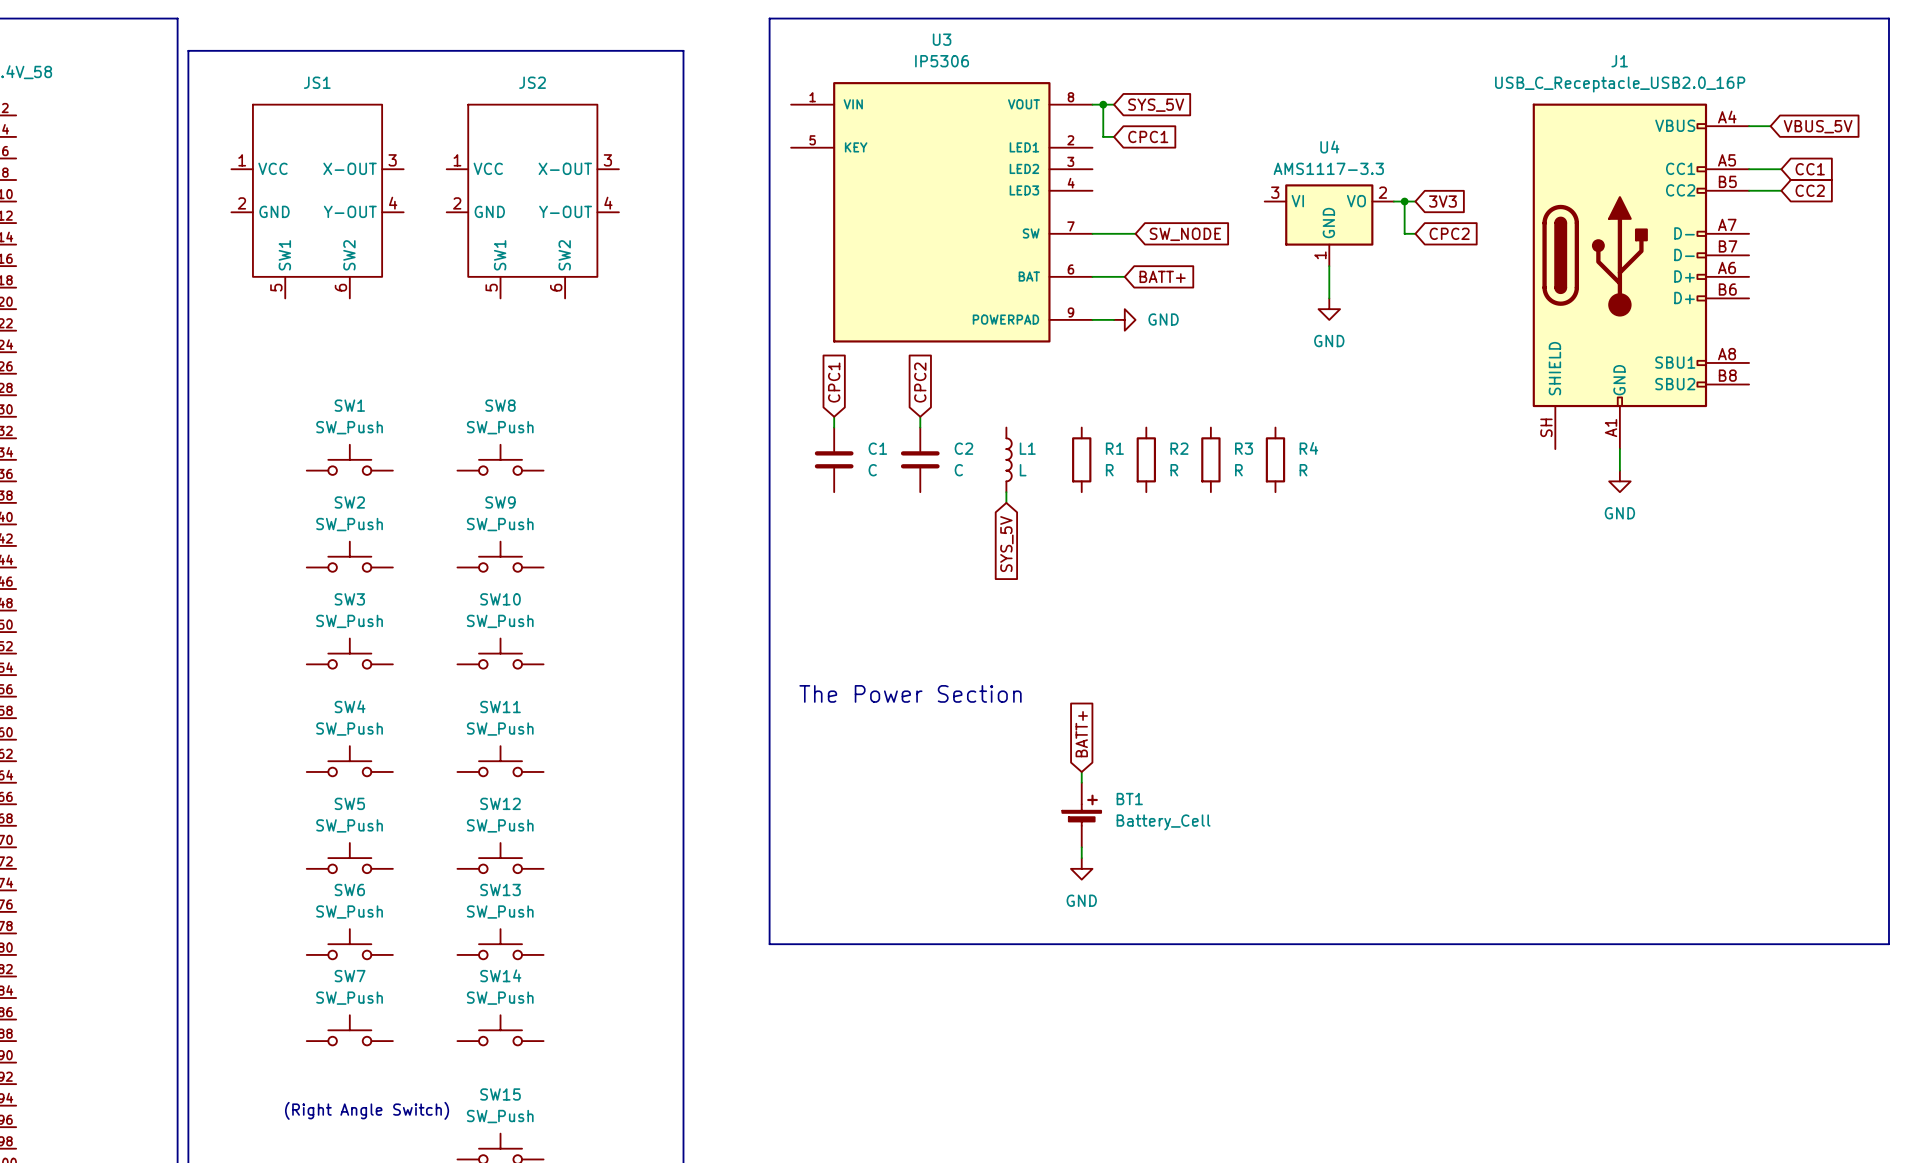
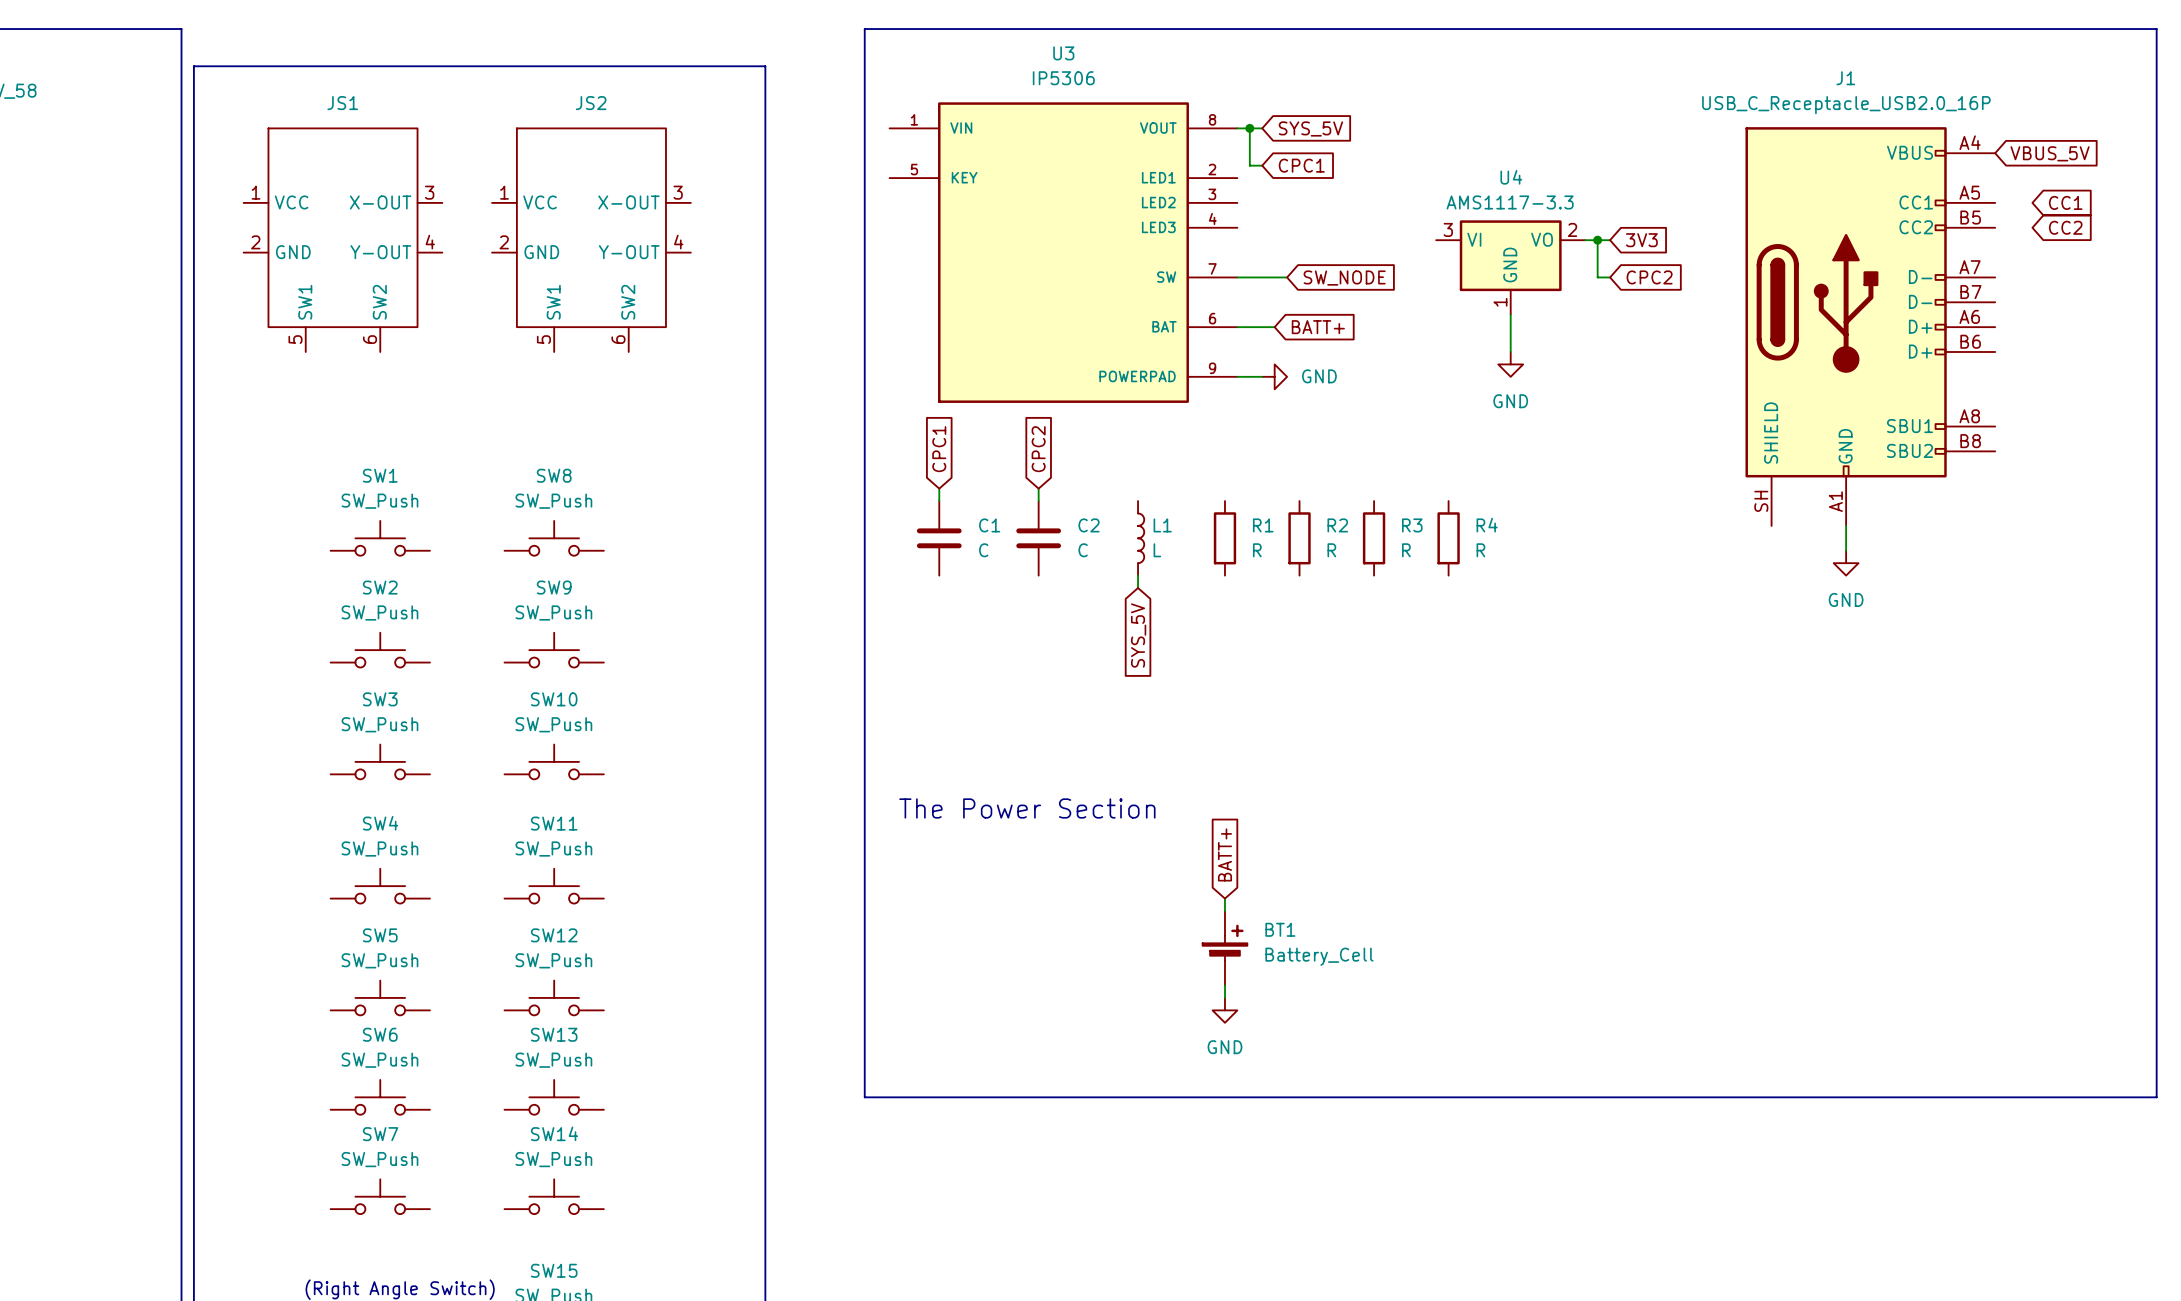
wire: (1749, 126) (1770, 126) -> none
global label position: VBUS_5V (1818, 126) -> VBUS_5V (2050, 153)
wire: (1749, 169) (1781, 169) -> none
wire: (1749, 190) (1781, 190) -> none

